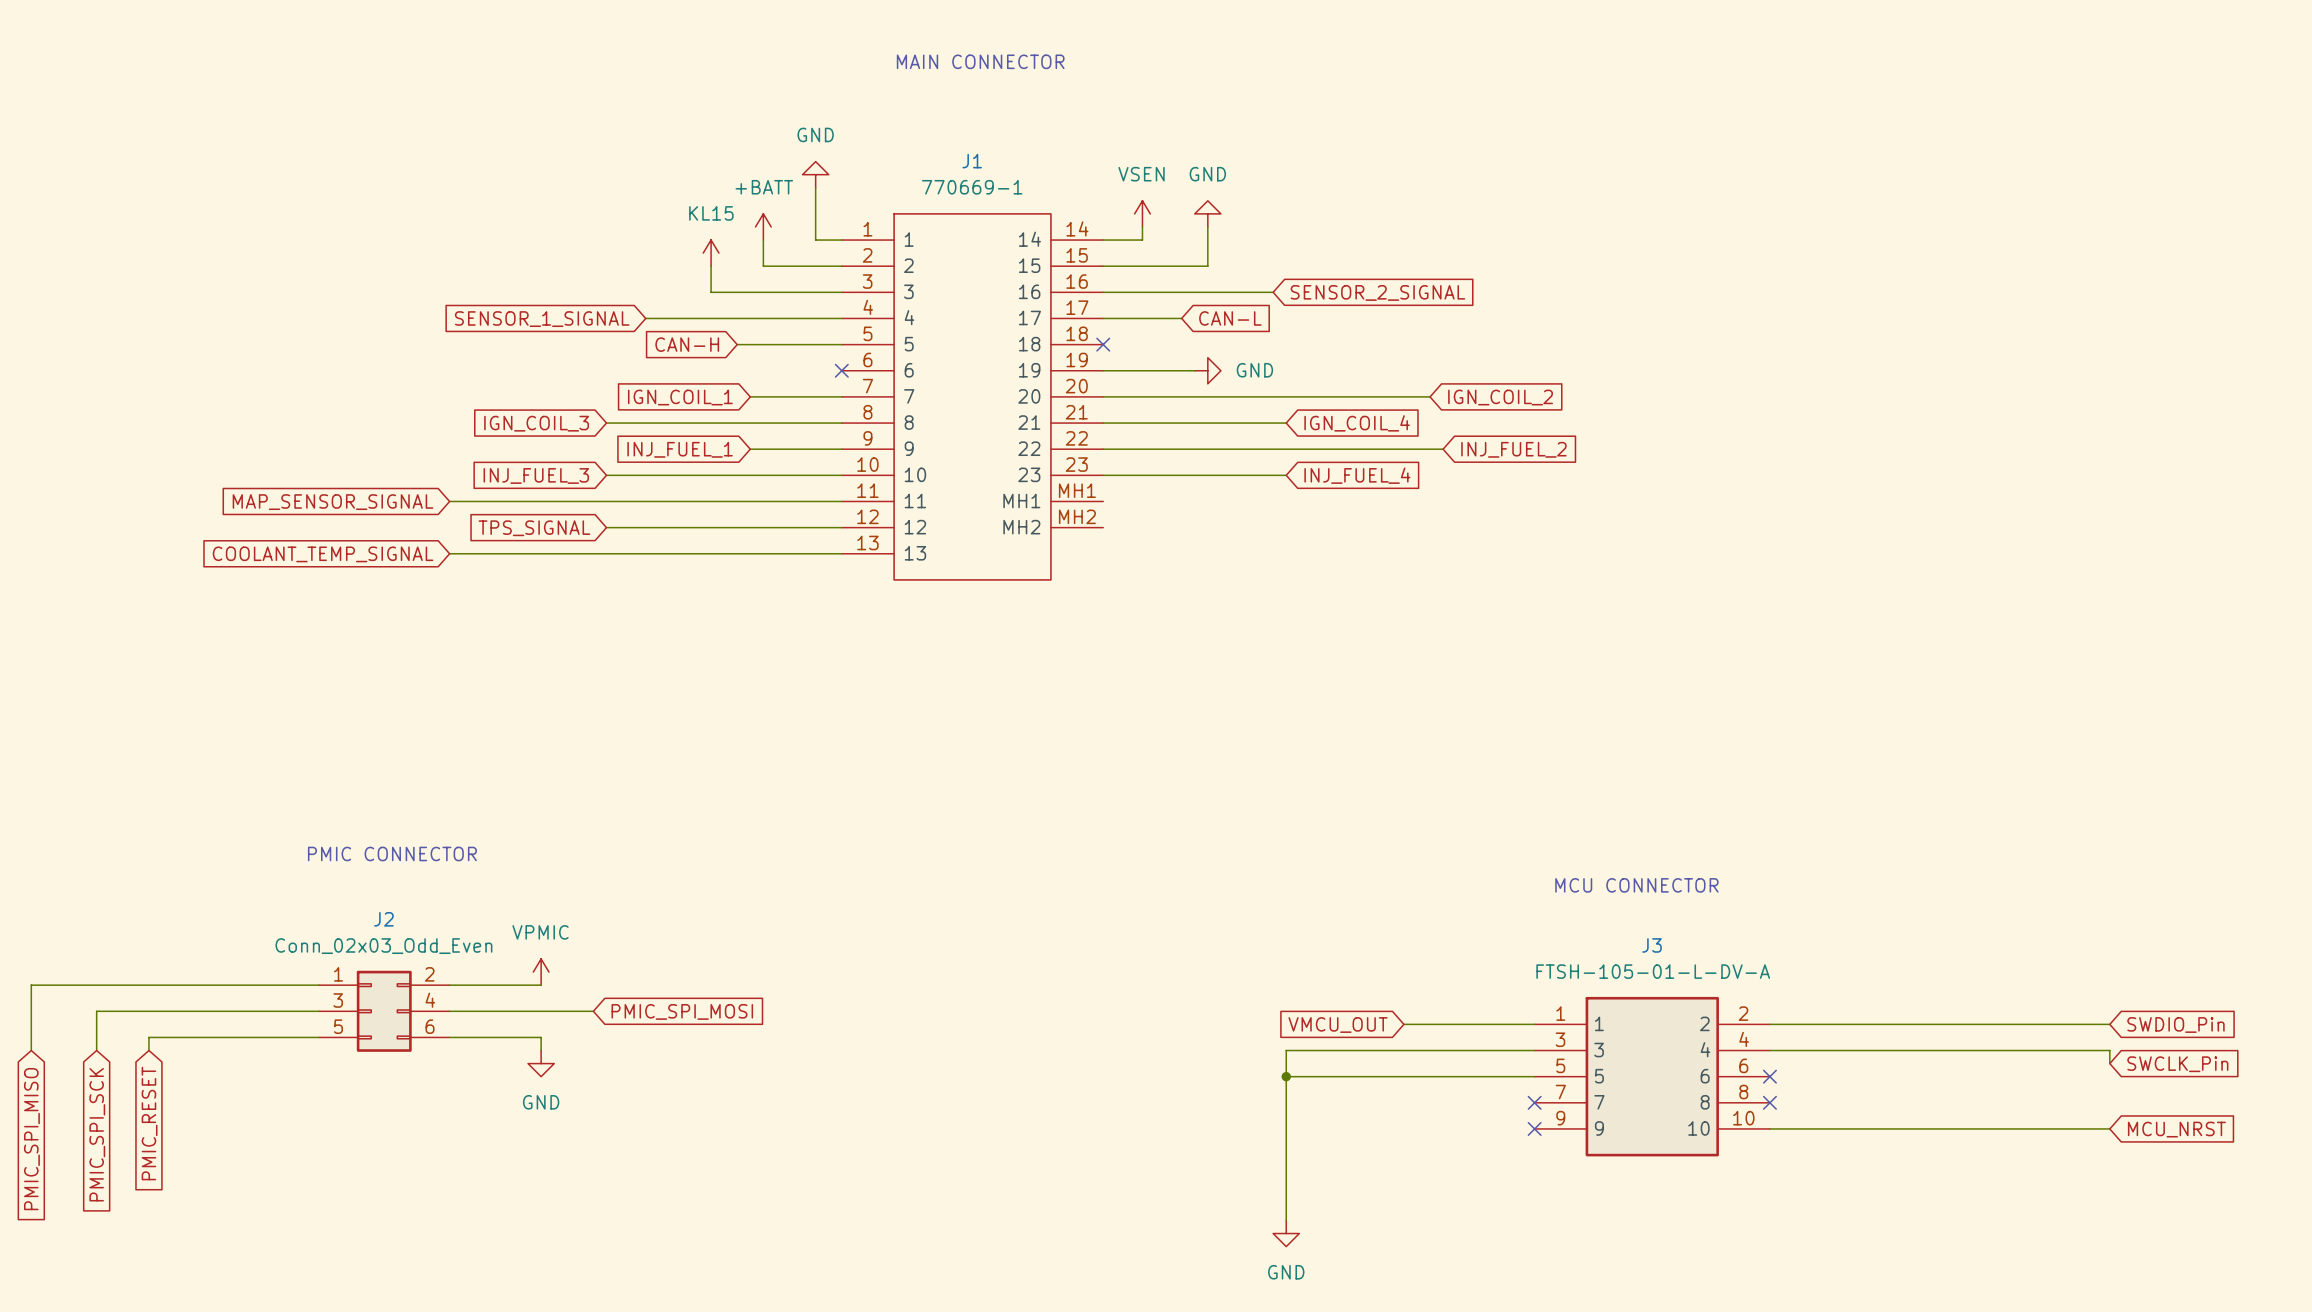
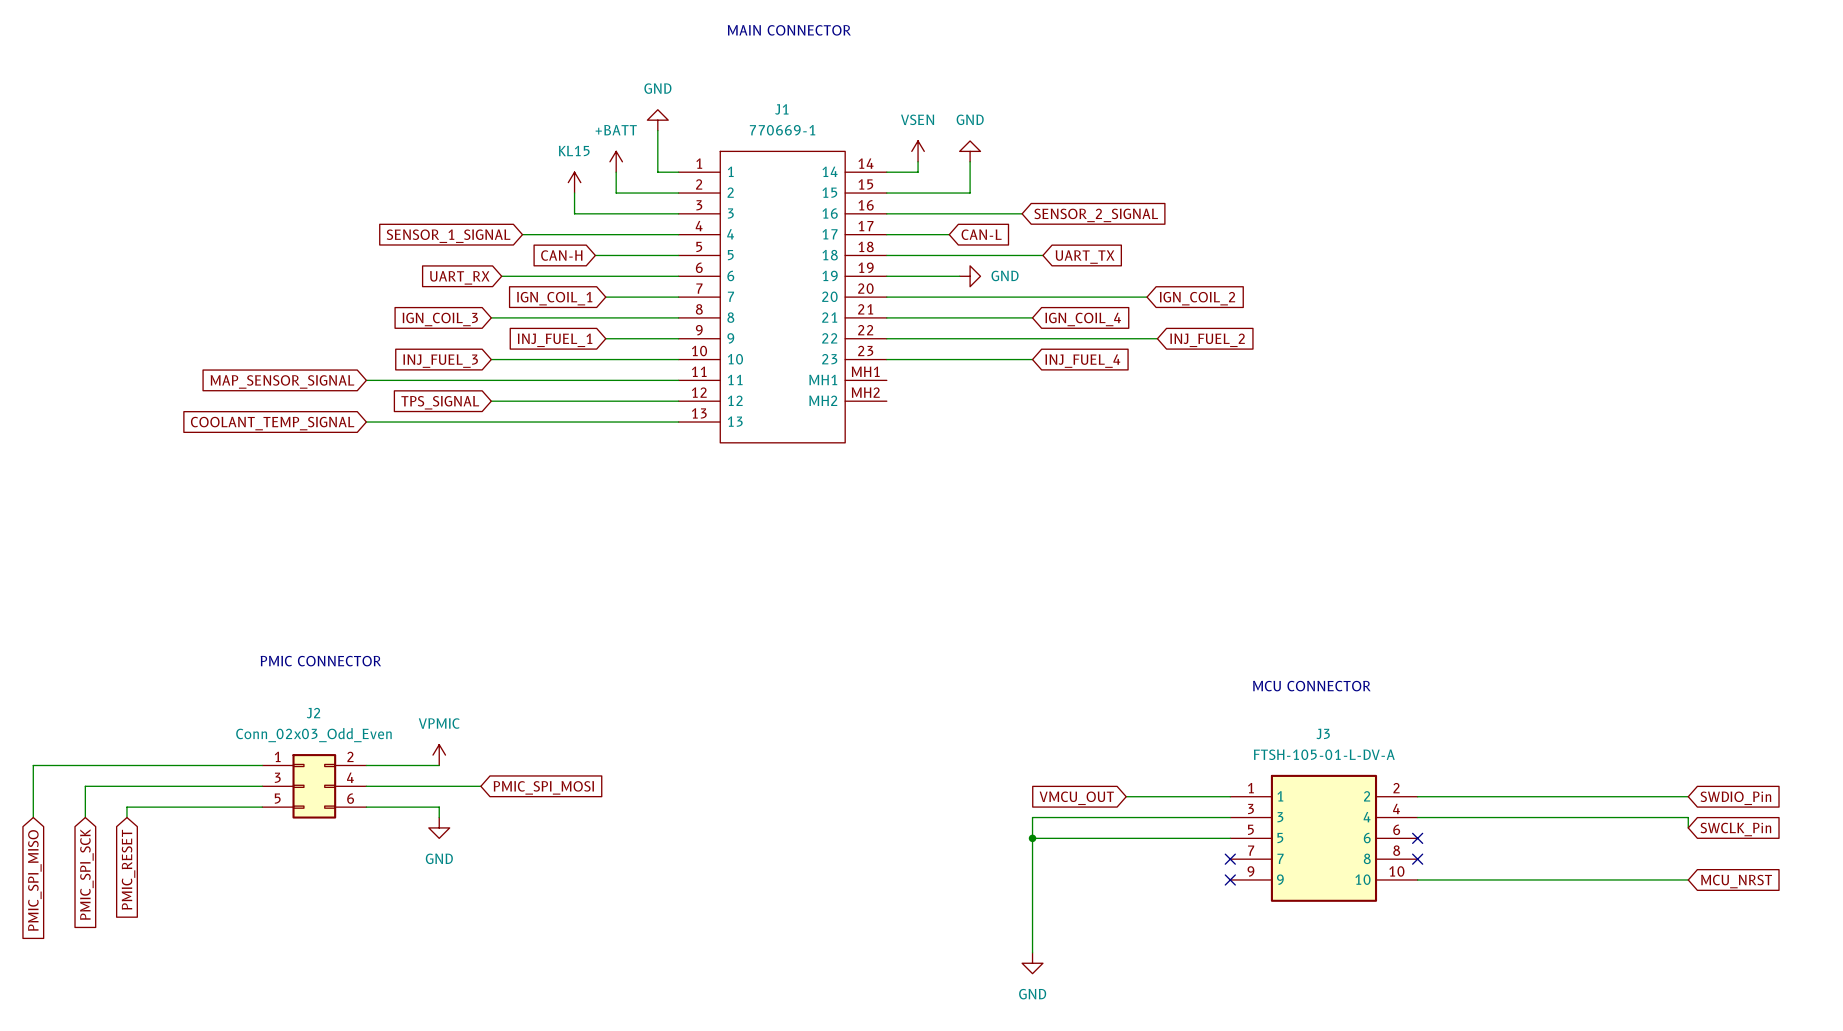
wire: none -> (886, 255) (1042, 255)
no-connect mark: (1103, 344) -> none
global label: none -> UART_TX (1085, 257)
wire: none -> (501, 276) (678, 276)
no-connect mark: (841, 370) -> none
global label: none -> UART_RX (459, 277)

